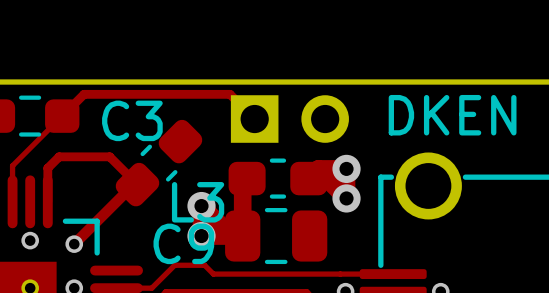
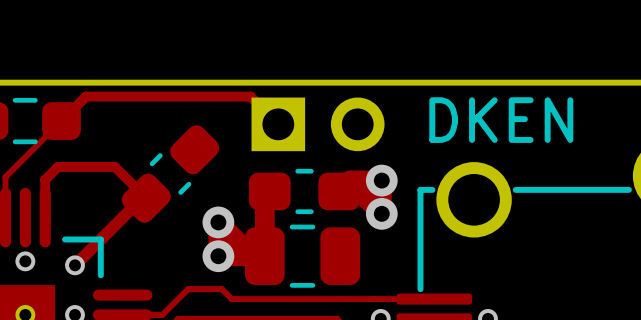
text: C3 (132, 120) -> none
text: L3 (198, 202) -> none
text: C9 (183, 243) -> none

